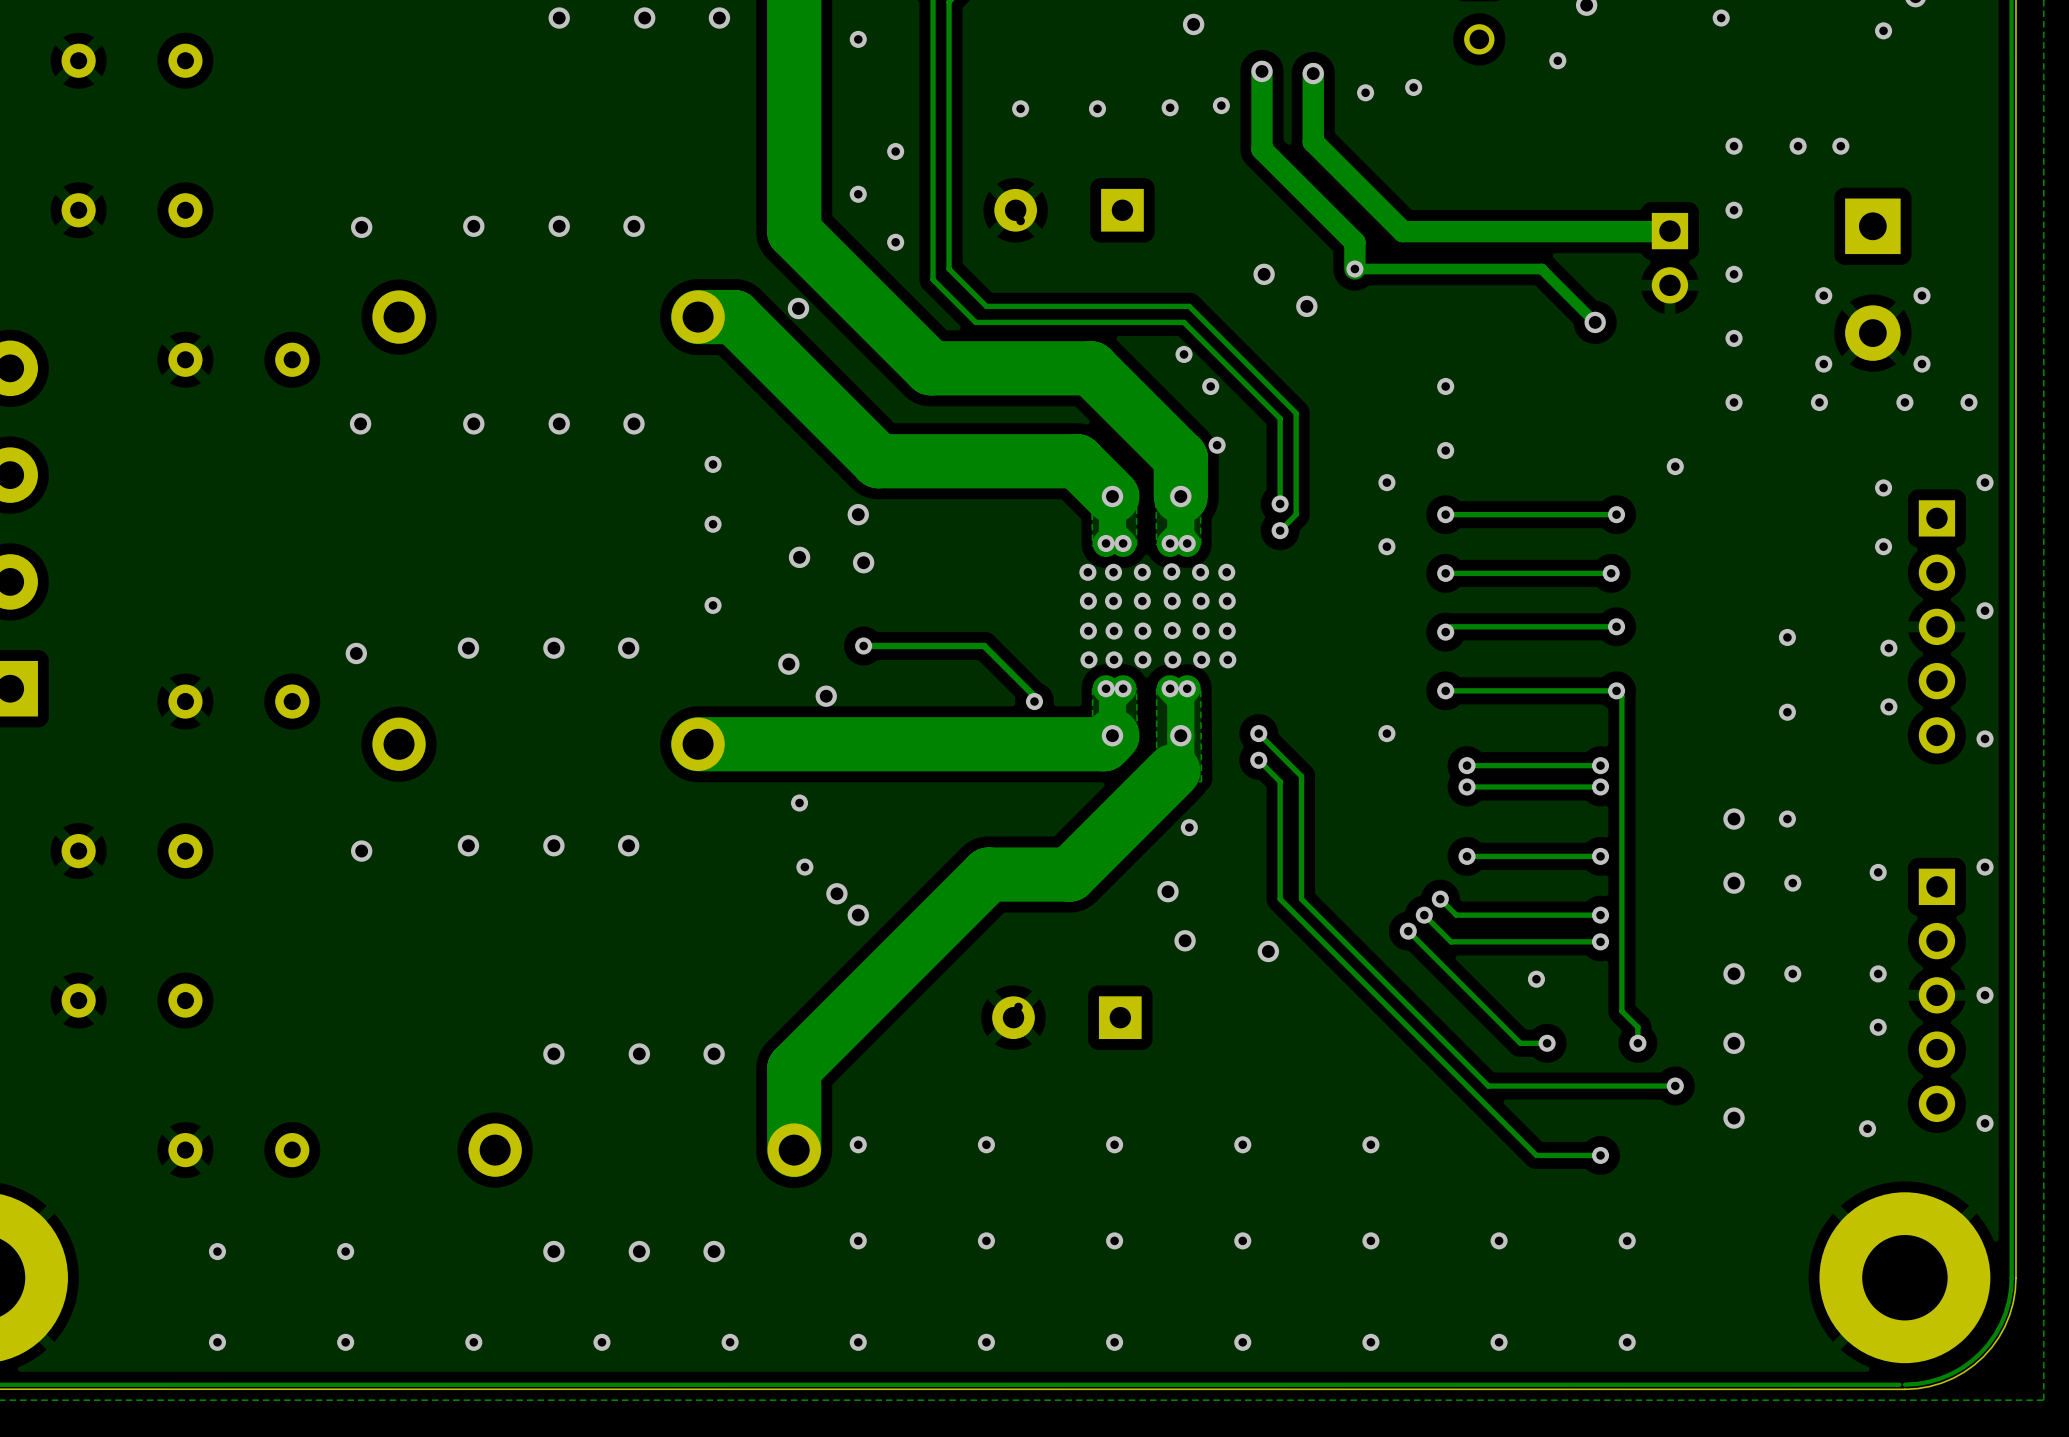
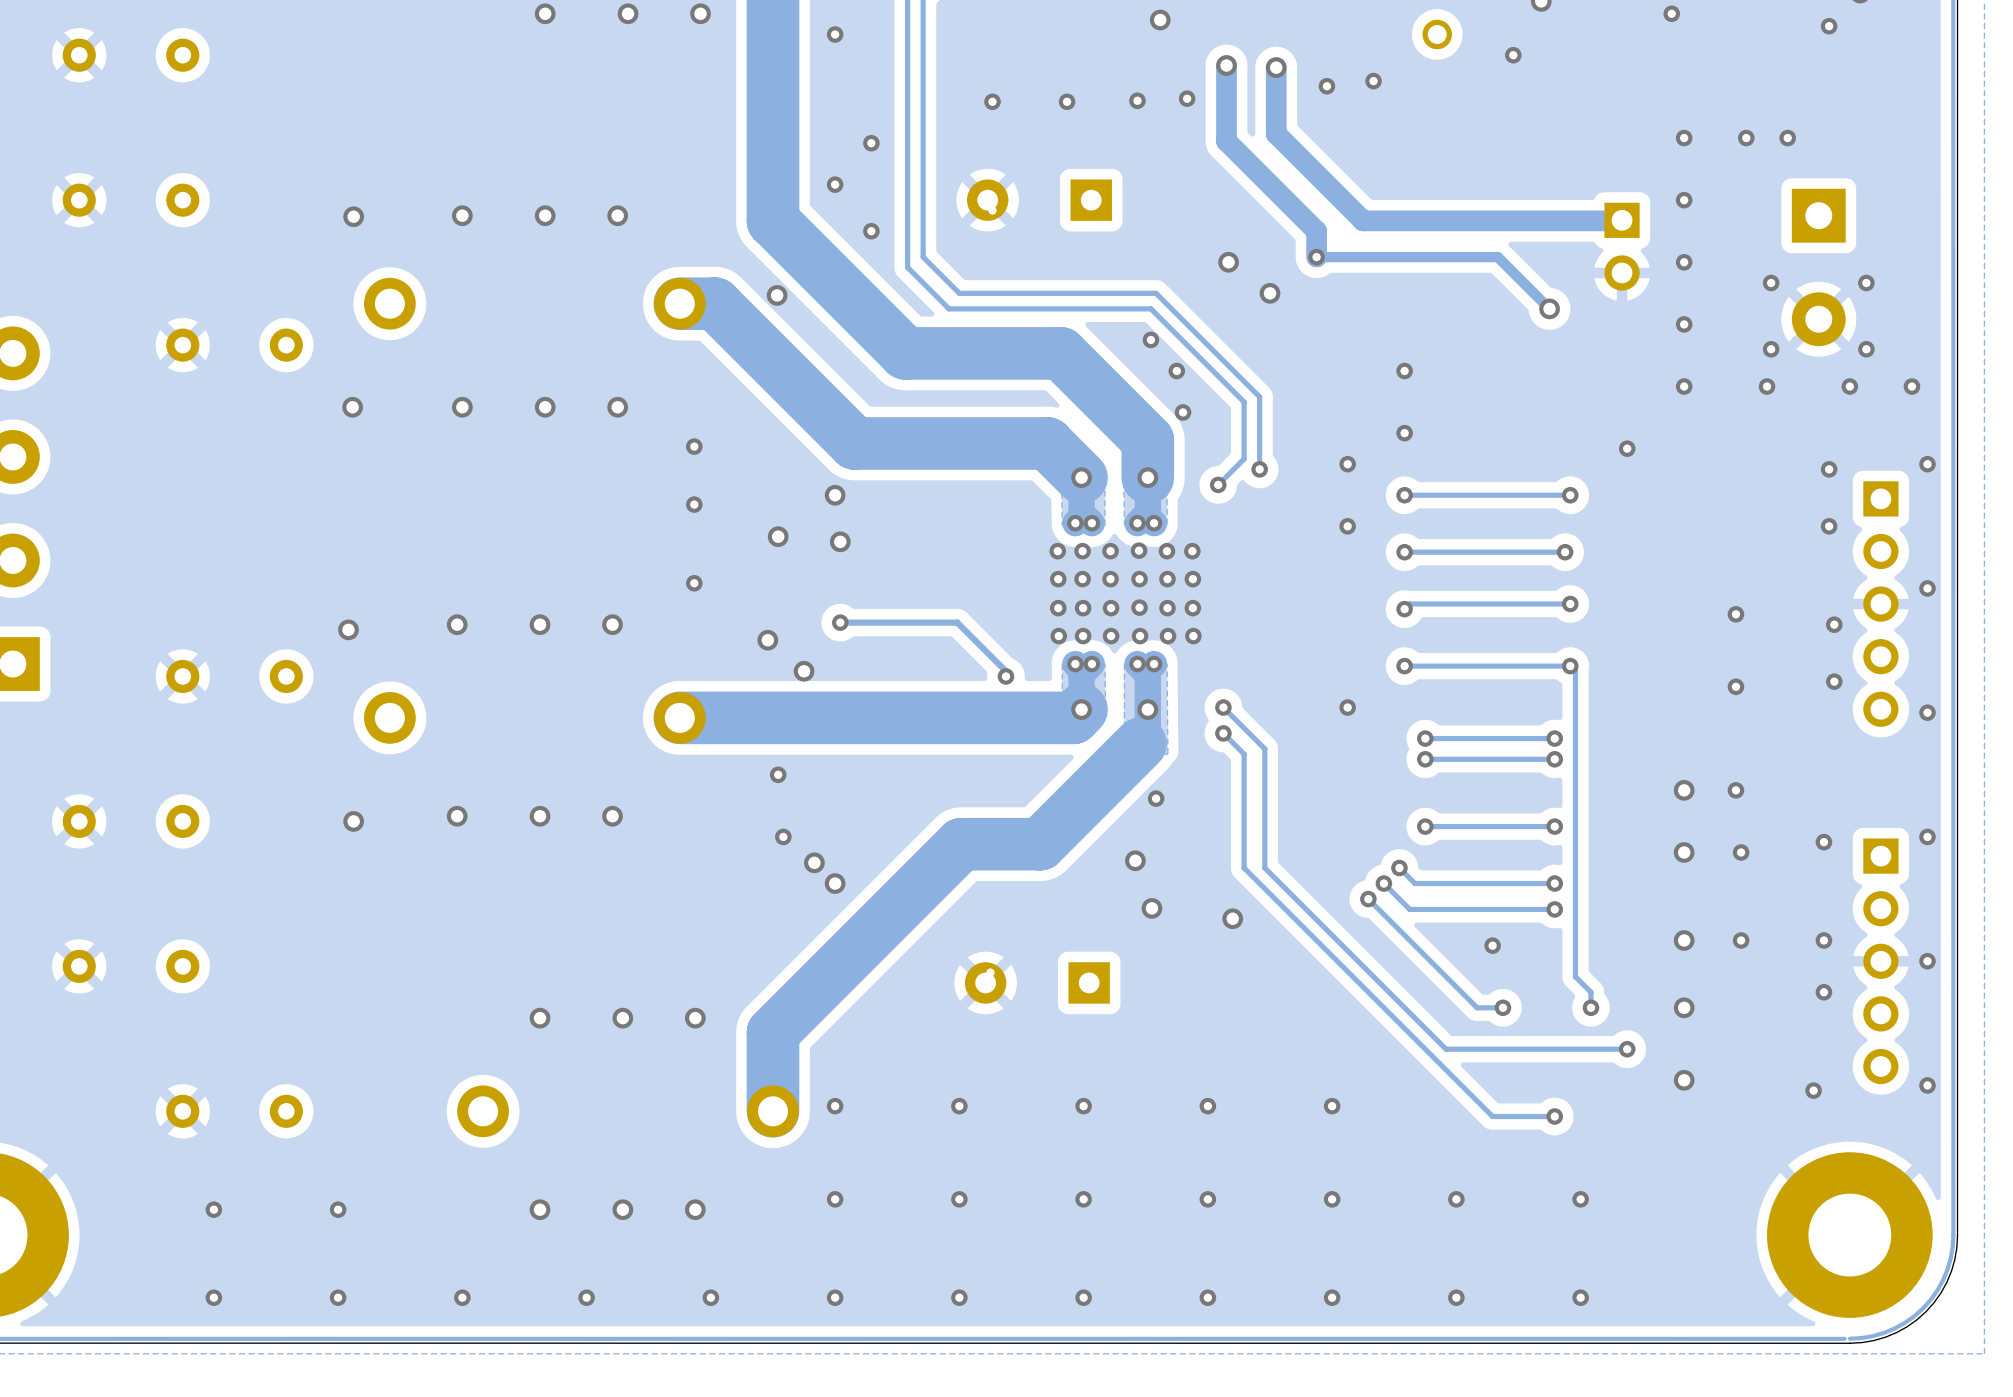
via position: (1217, 445) -> (1183, 412)
track: (1280, 477) (1280, 503) -> (1244, 459) (1218, 484)
track: (1296, 487) (1296, 514) (1280, 530) -> none
via: none -> (1259, 469)
via: none -> (1218, 484)
via: (1280, 503) -> none
via: (1280, 530) -> none

